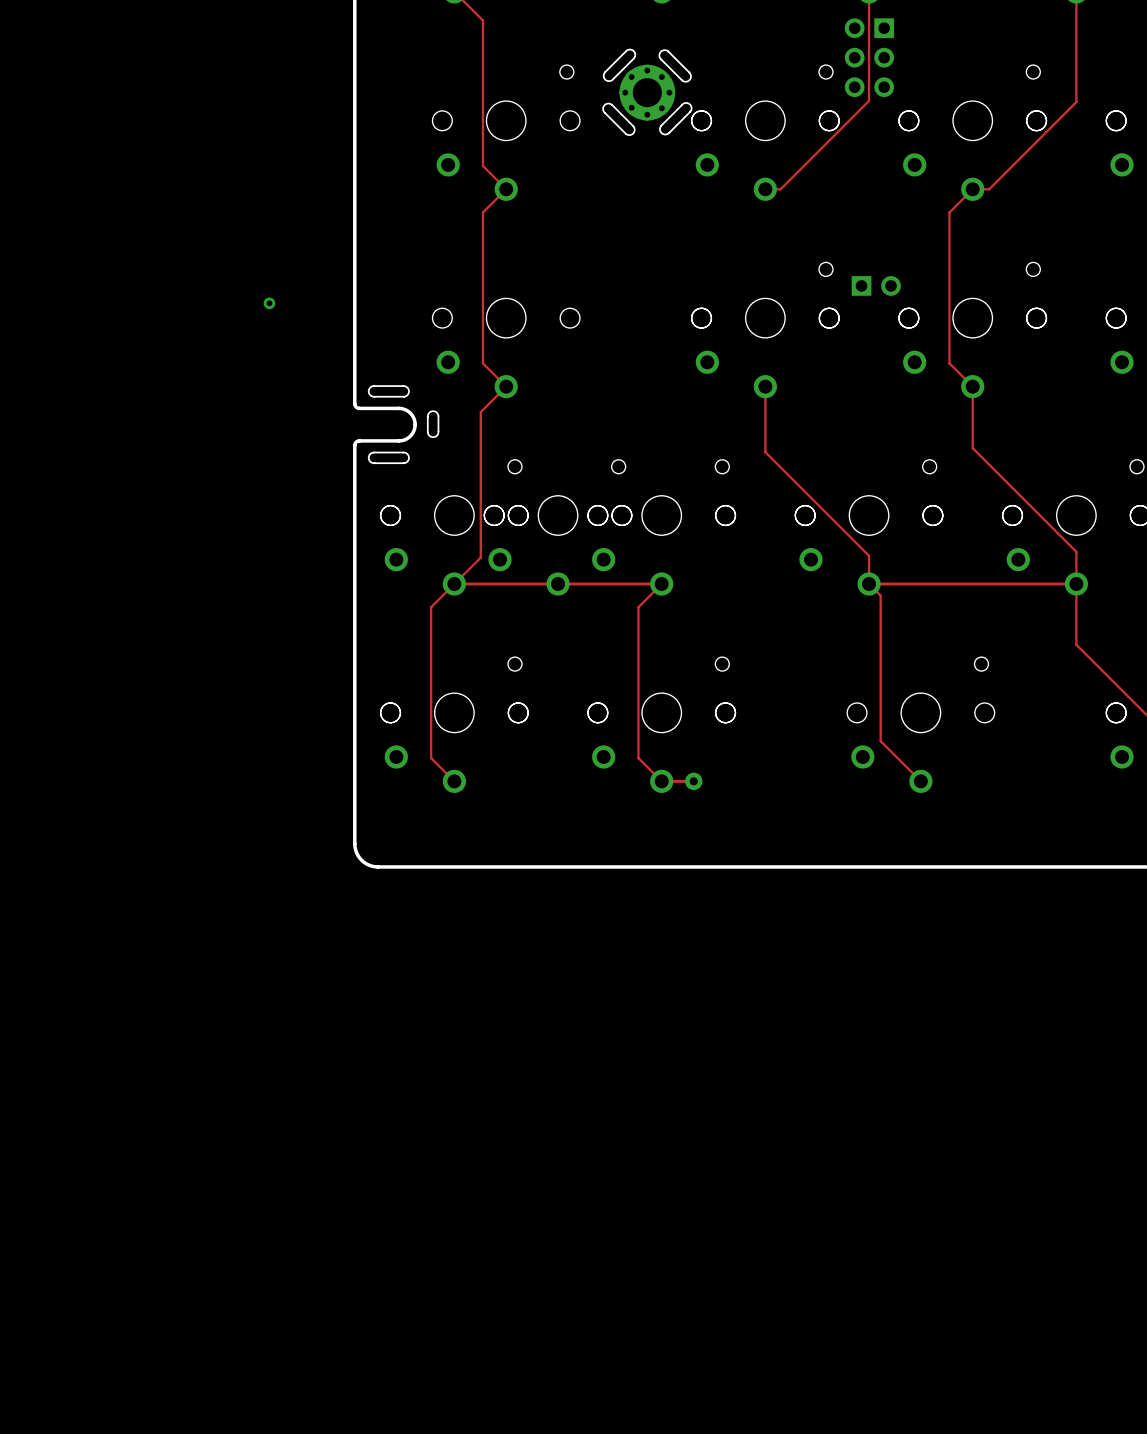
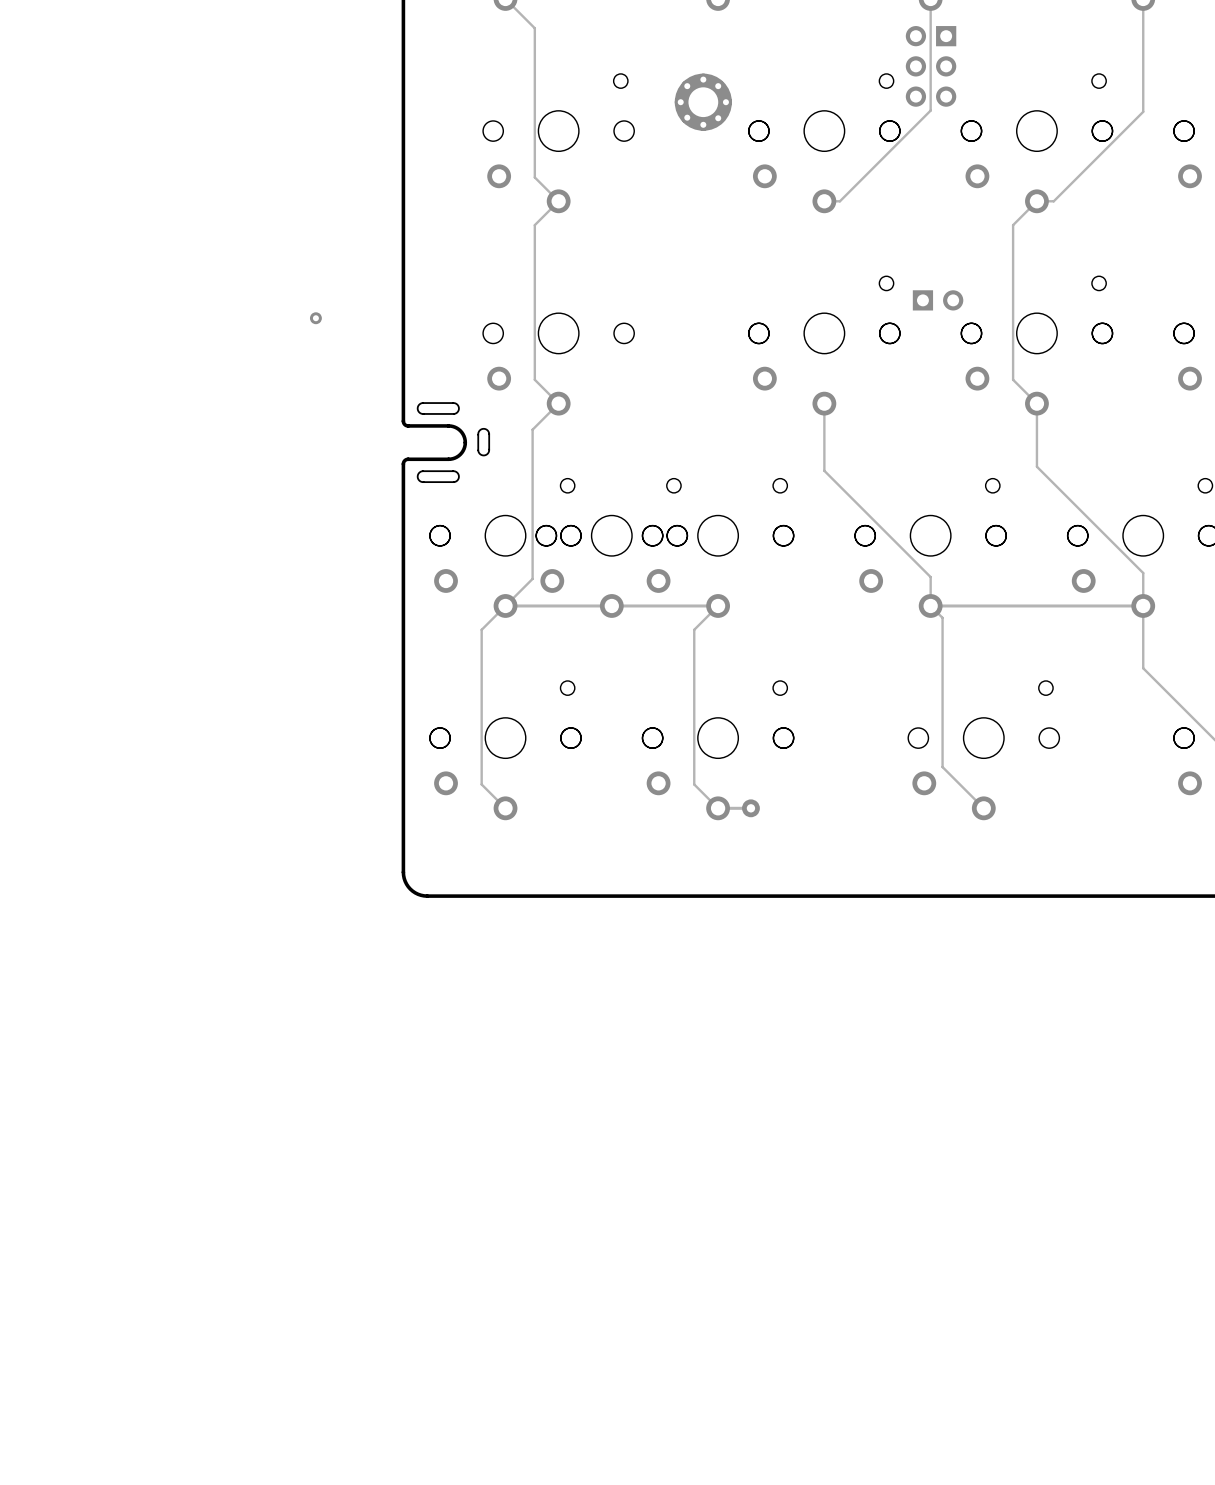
board edge: (625, 51) (604, 72) (603, 76) (606, 80) (612, 79) (634, 57) (635, 53) (632, 50) (625, 51) -> none
board edge: (668, 51) (690, 73) (690, 77) (688, 80) (682, 80) (660, 58) (661, 51) (668, 51) -> none
board edge: (611, 104) (633, 126) (634, 130) (632, 134) (625, 133) (604, 111) (604, 104) (611, 104) -> none
board edge: (682, 104) (660, 126) (660, 130) (662, 133) (668, 133) (690, 111) (689, 104) (685, 102) (682, 104) -> none

